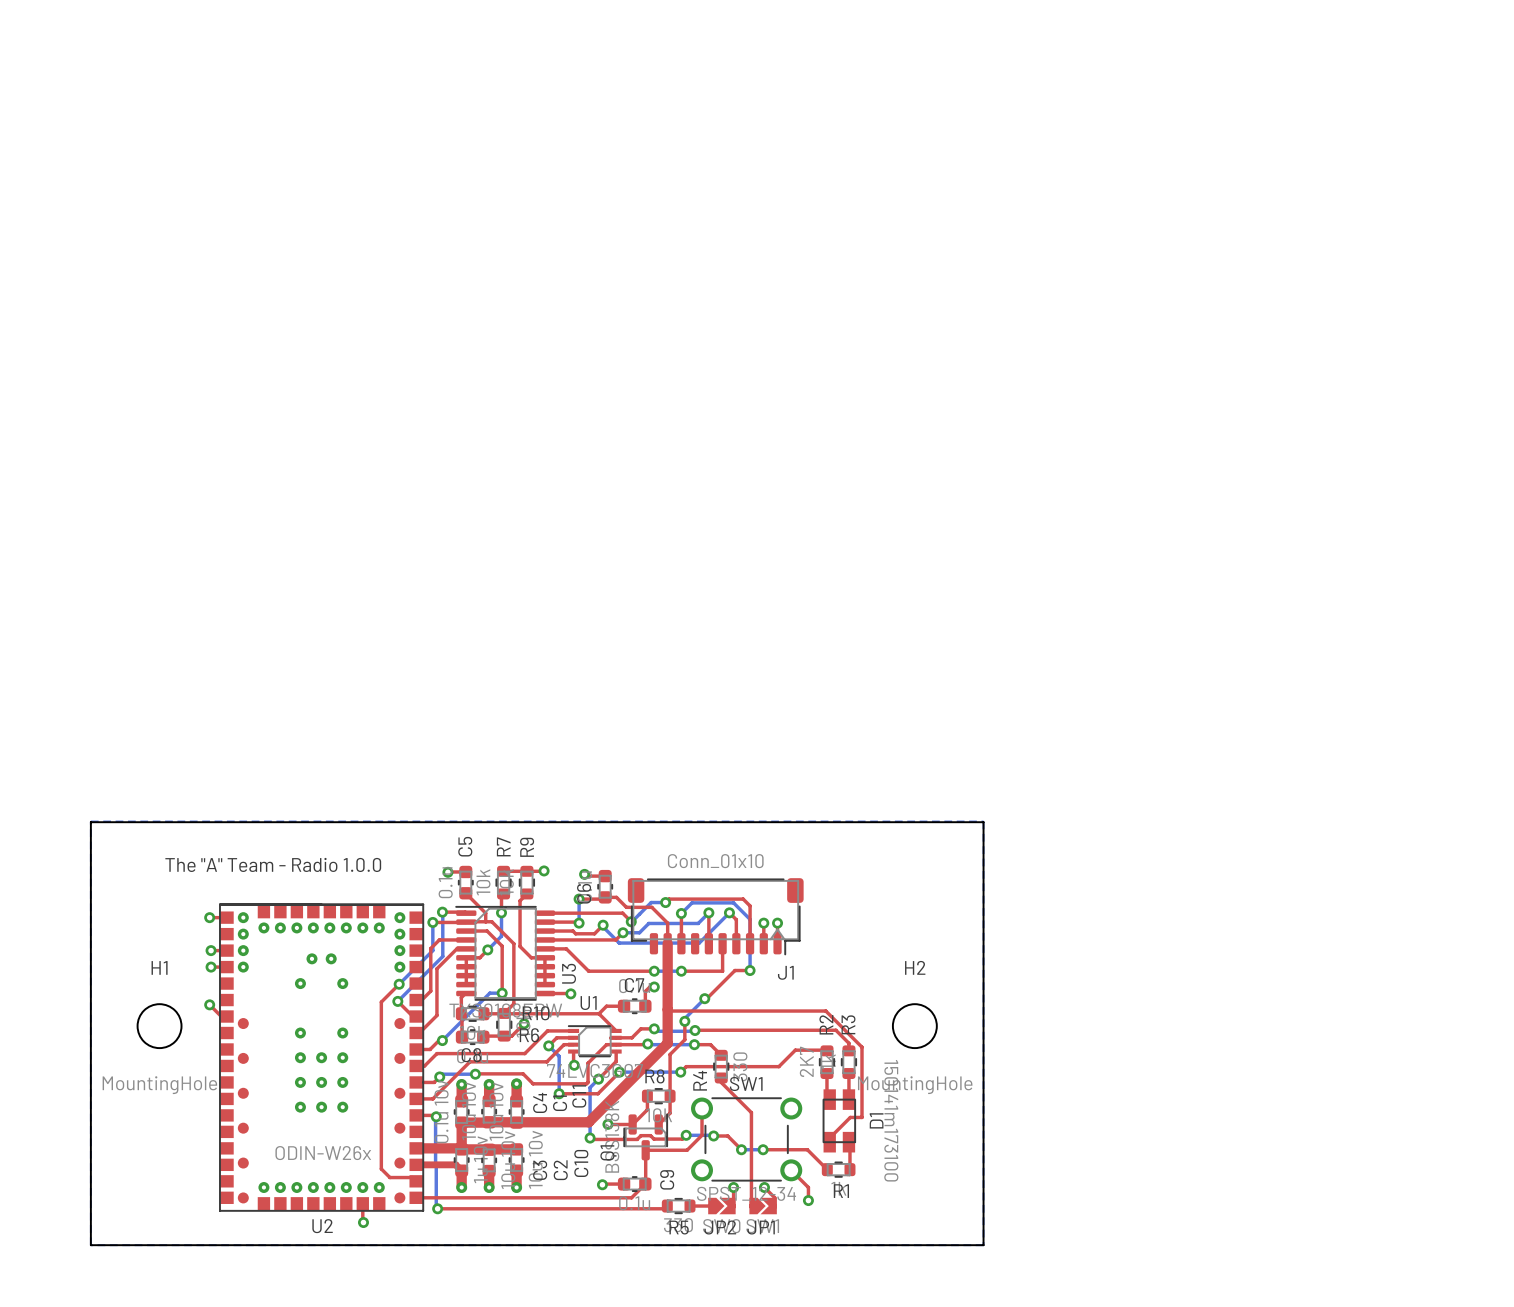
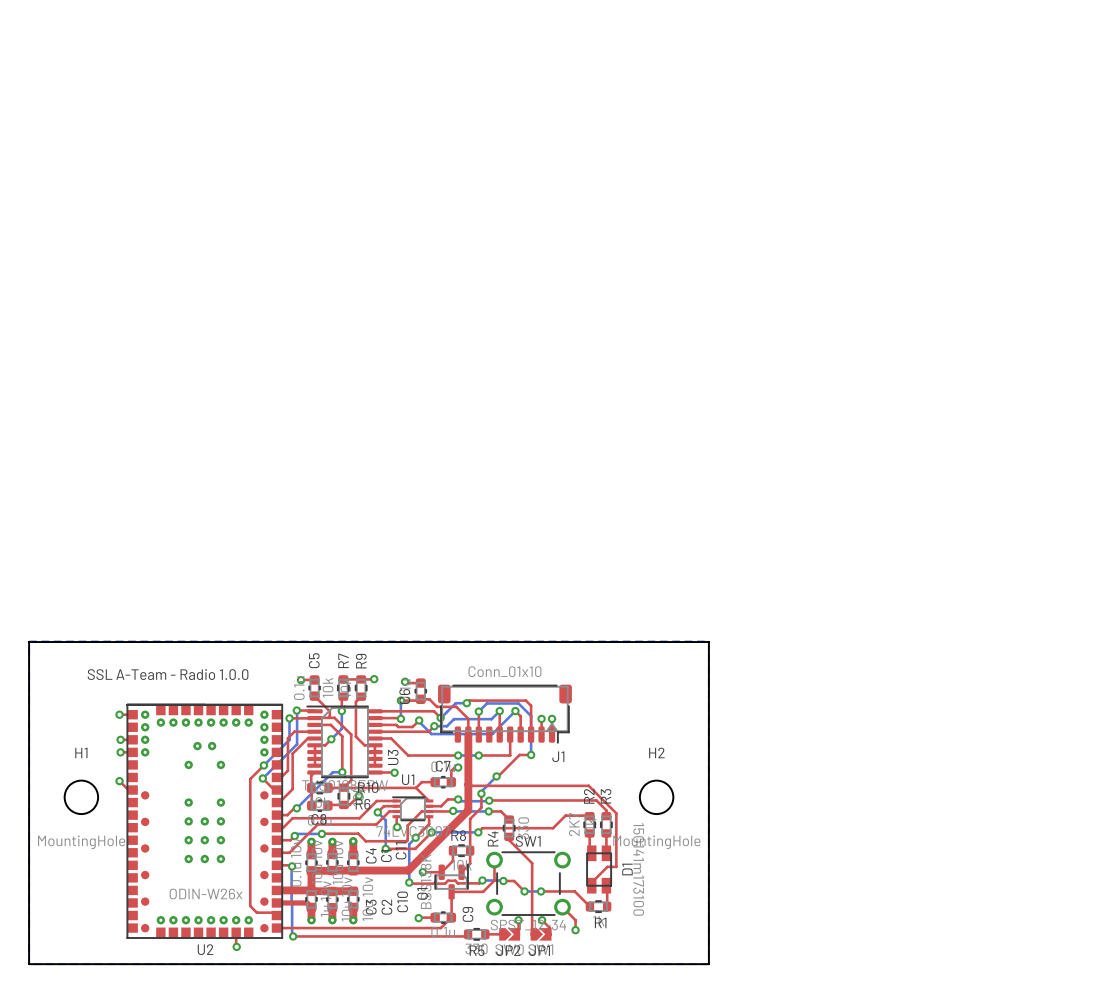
text: The "A" Team - Radio 1.0.0 (273, 864) -> SSL A-Team - Radio 1.0.0 (168, 674)

